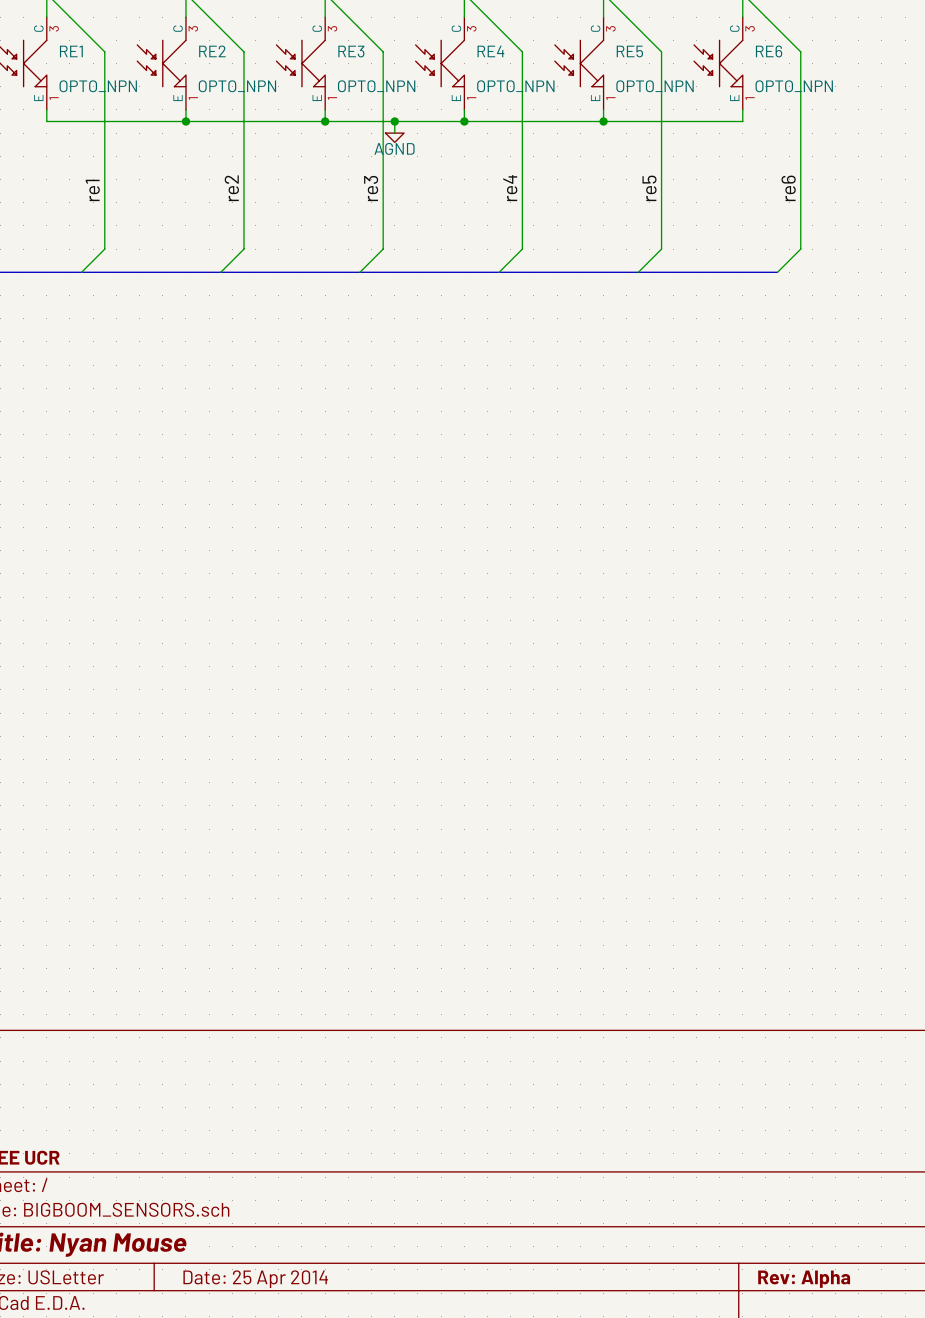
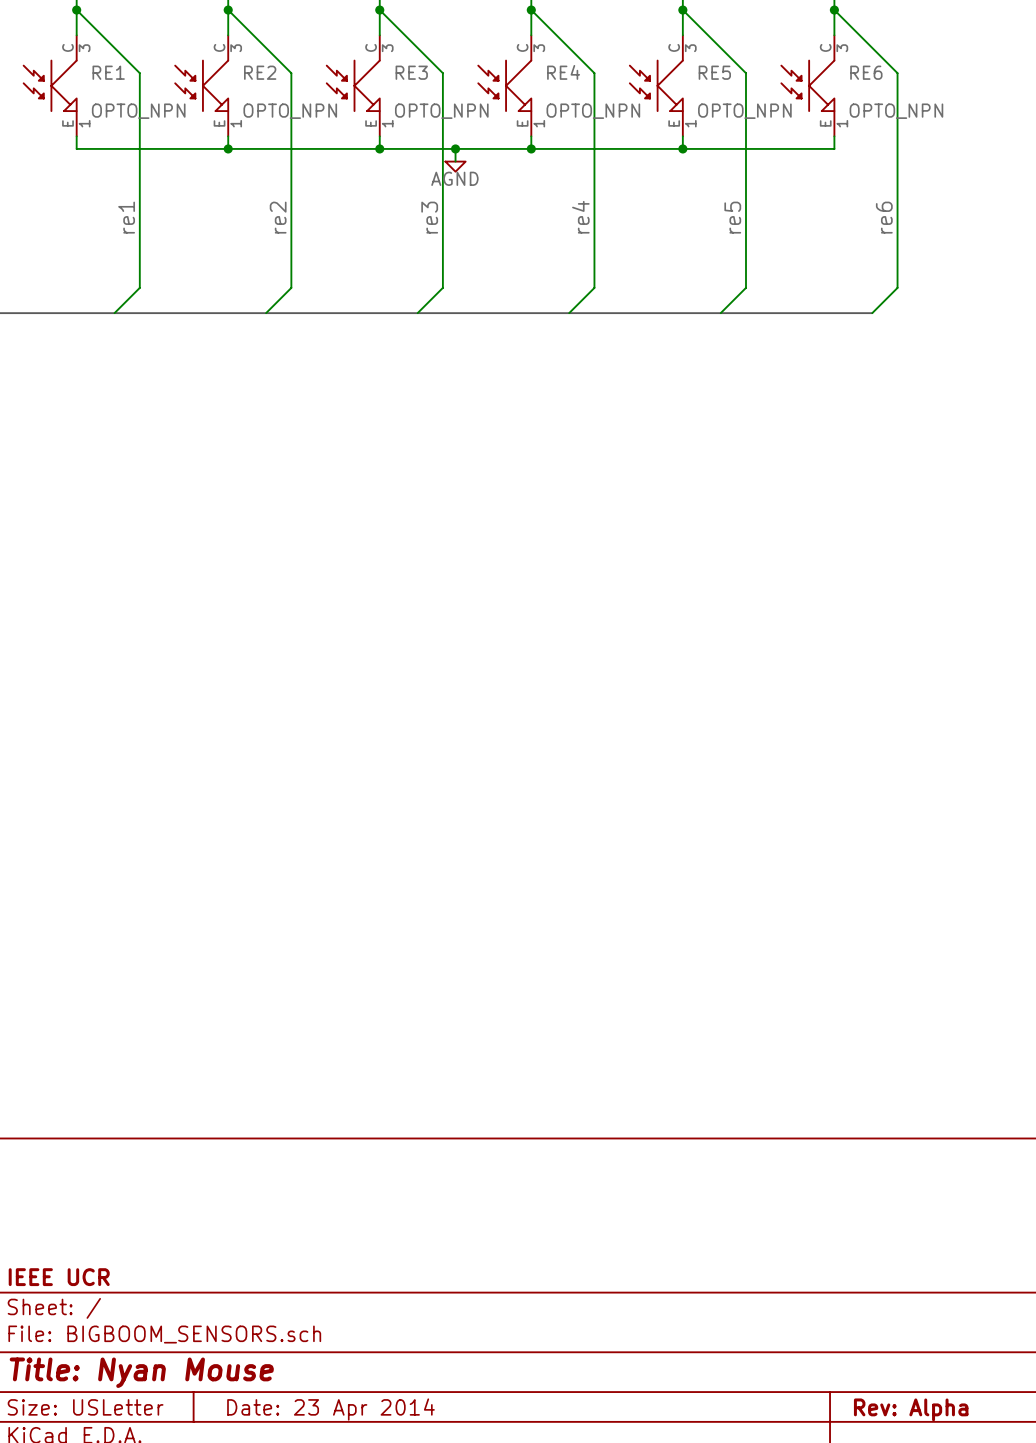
title block: Date: 25 Apr 2014 (255, 1279) -> Date: 23 Apr 2014 (330, 1409)

